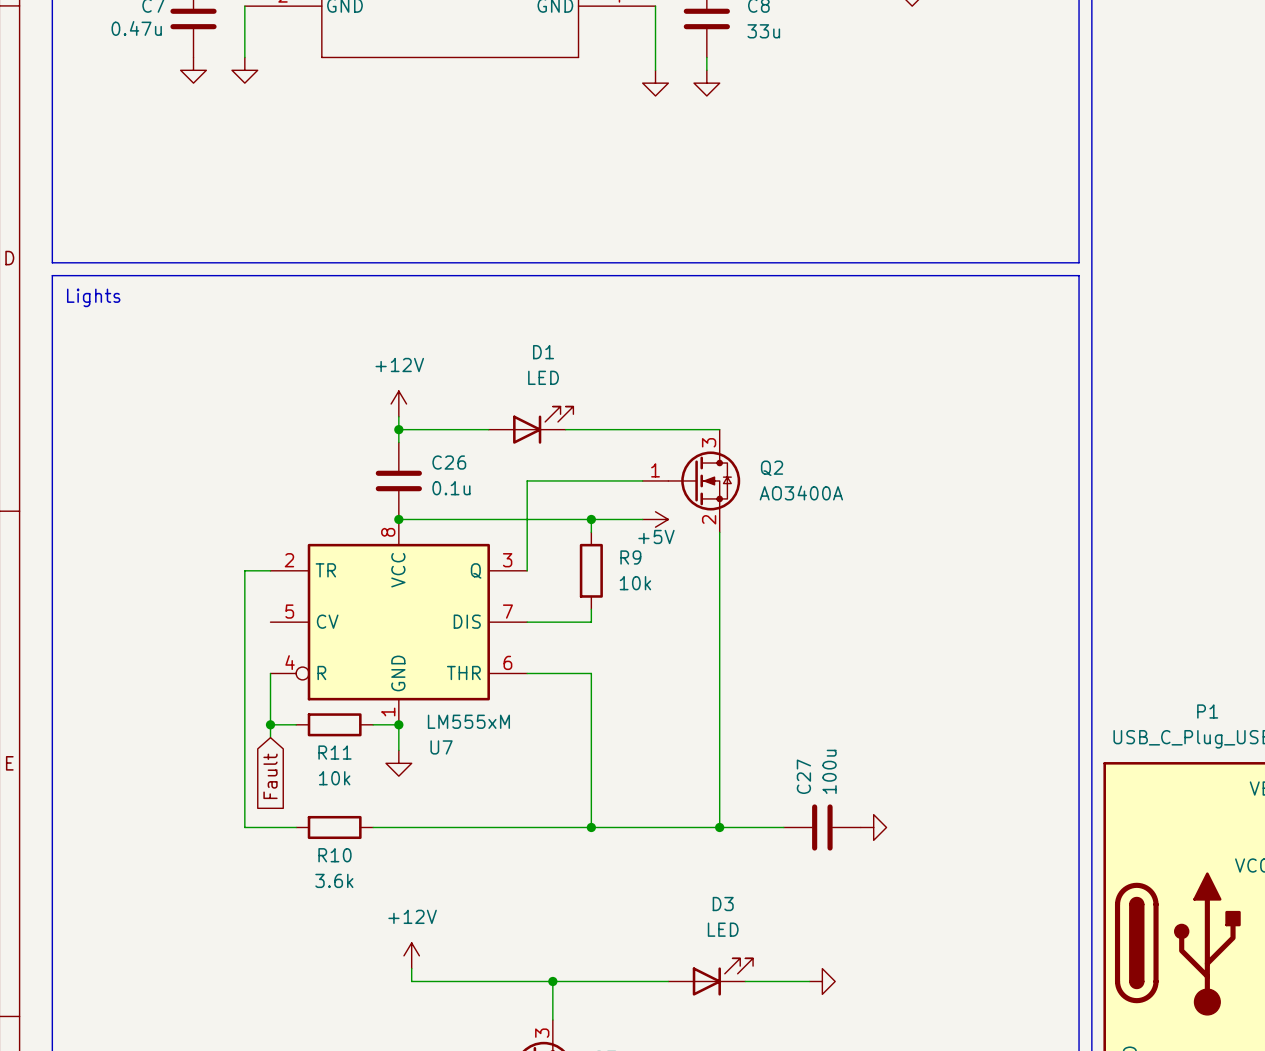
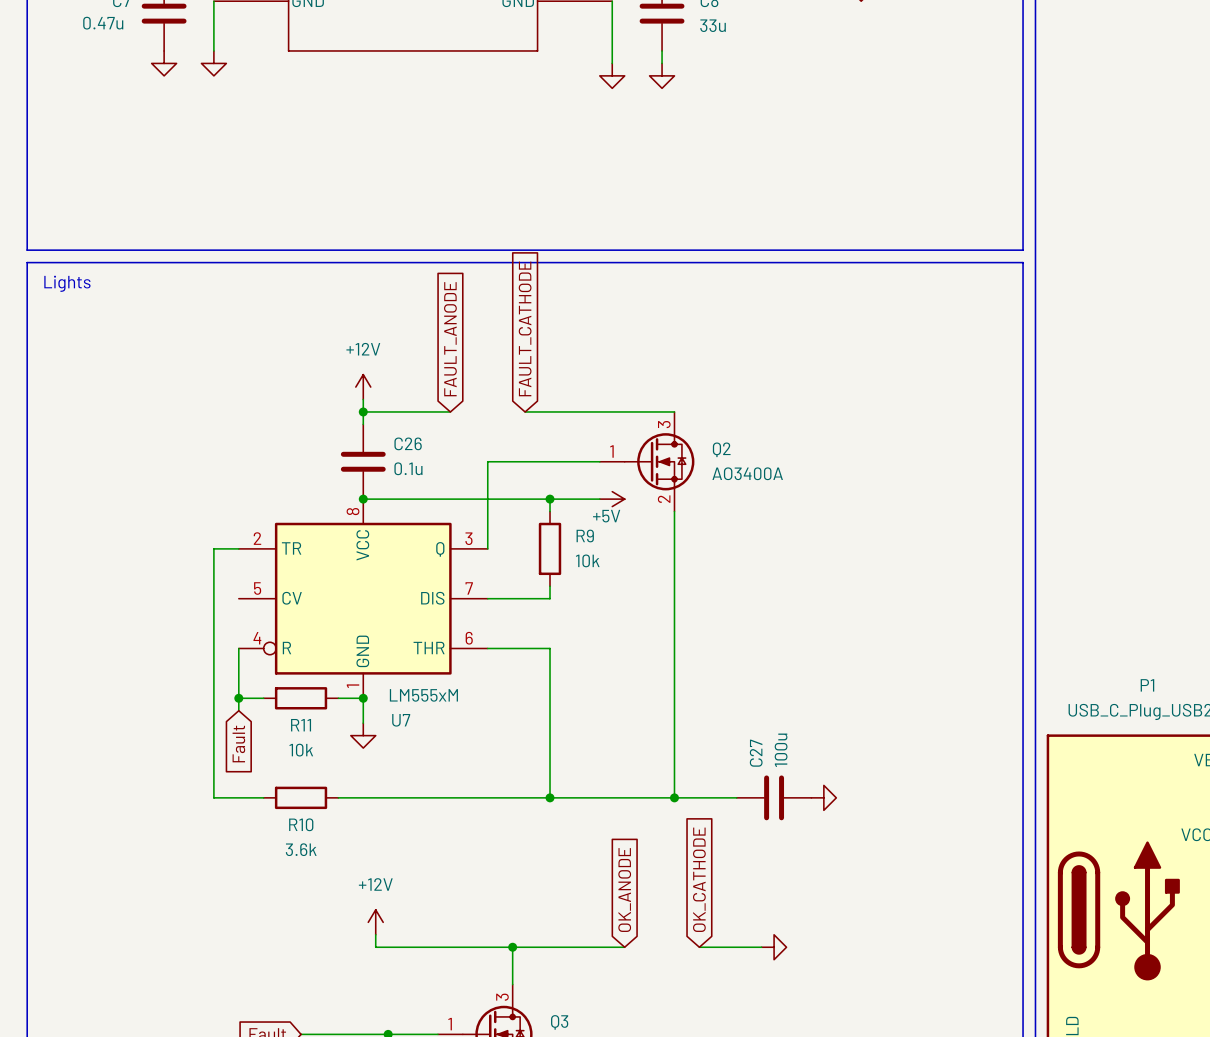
global label: none -> FAULT_CATHODE (525, 328)
global label: none -> FAULT_ANODE (450, 339)
D1: LED (531, 425) -> none
global label: none -> OK_CATHODE (699, 879)
global label: none -> OK_ANODE (624, 890)
D3: LED (710, 977) -> none

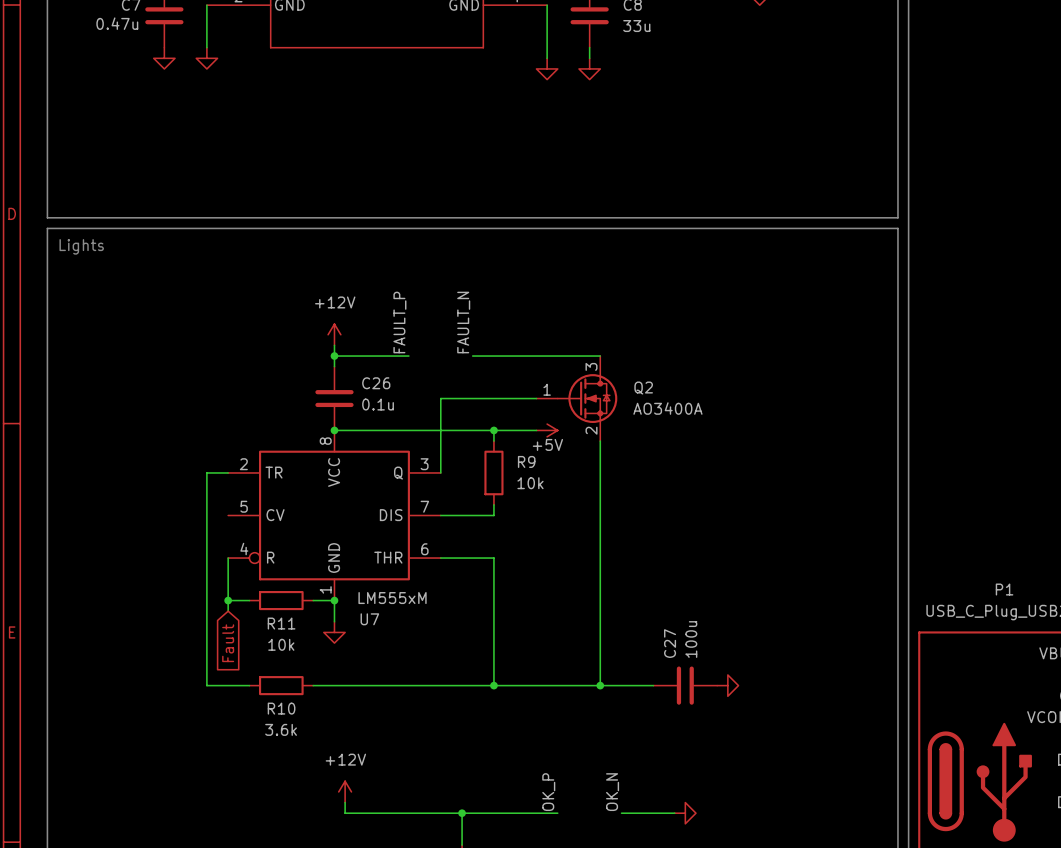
global label: FAULT_CATHODE (525, 328) -> none
global label: FAULT_ANODE (450, 339) -> none
label: none -> FAULT_P (399, 322)
label: none -> FAULT_N (463, 322)
global label: OK_CATHODE (699, 879) -> none
global label: OK_ANODE (624, 890) -> none
label: none -> OK_P (548, 792)
label: none -> OK_N (612, 792)

